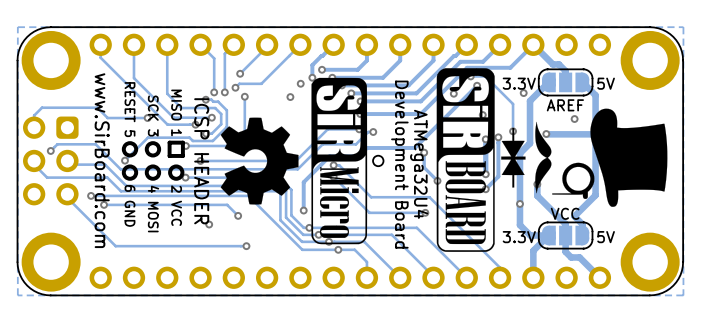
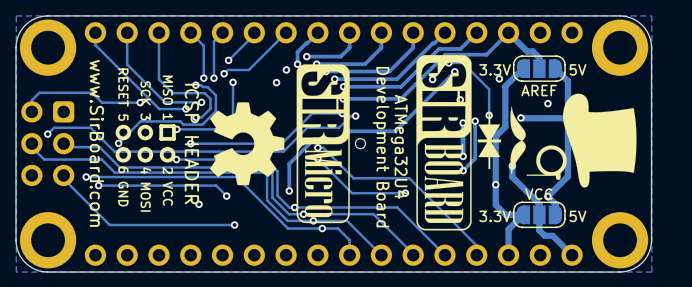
track: (424, 152) (424, 167) (437, 180) -> none
via: (424, 152) -> none
via: (437, 180) -> none
via: none -> (547, 196)

